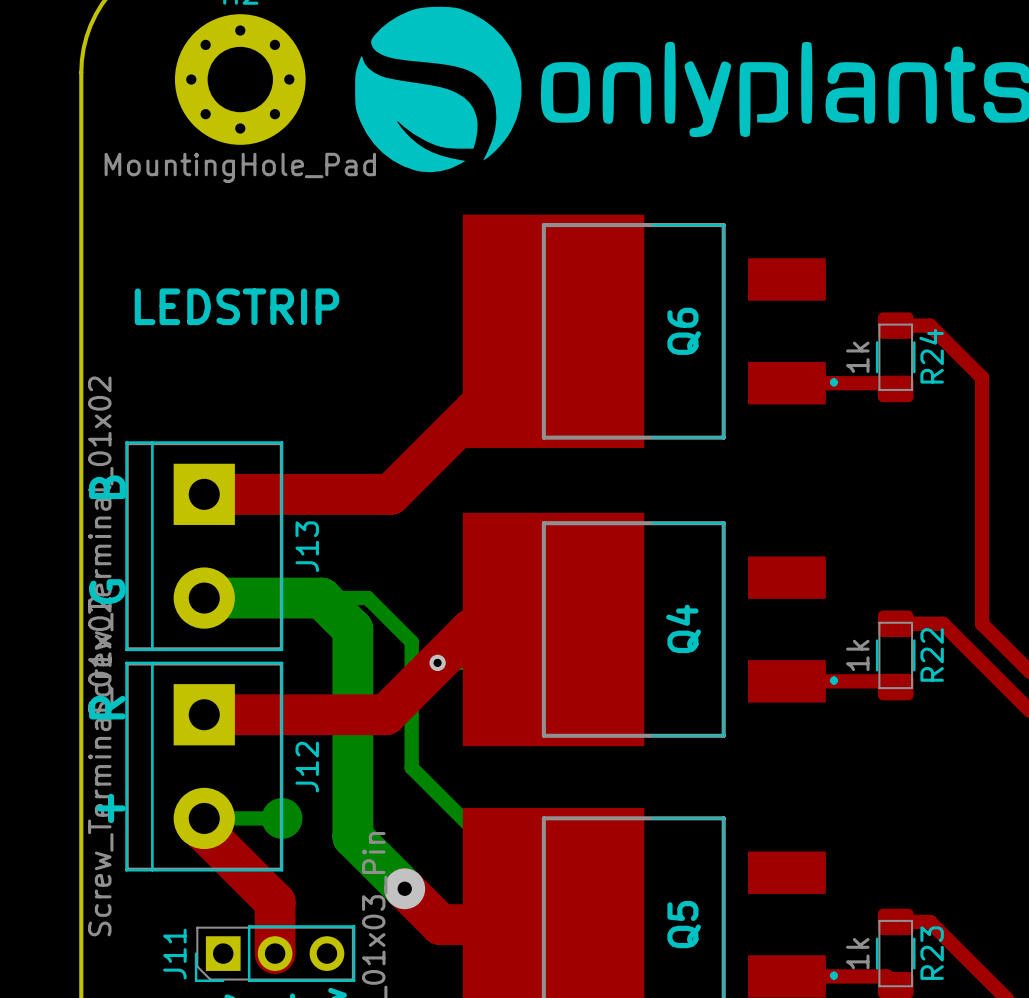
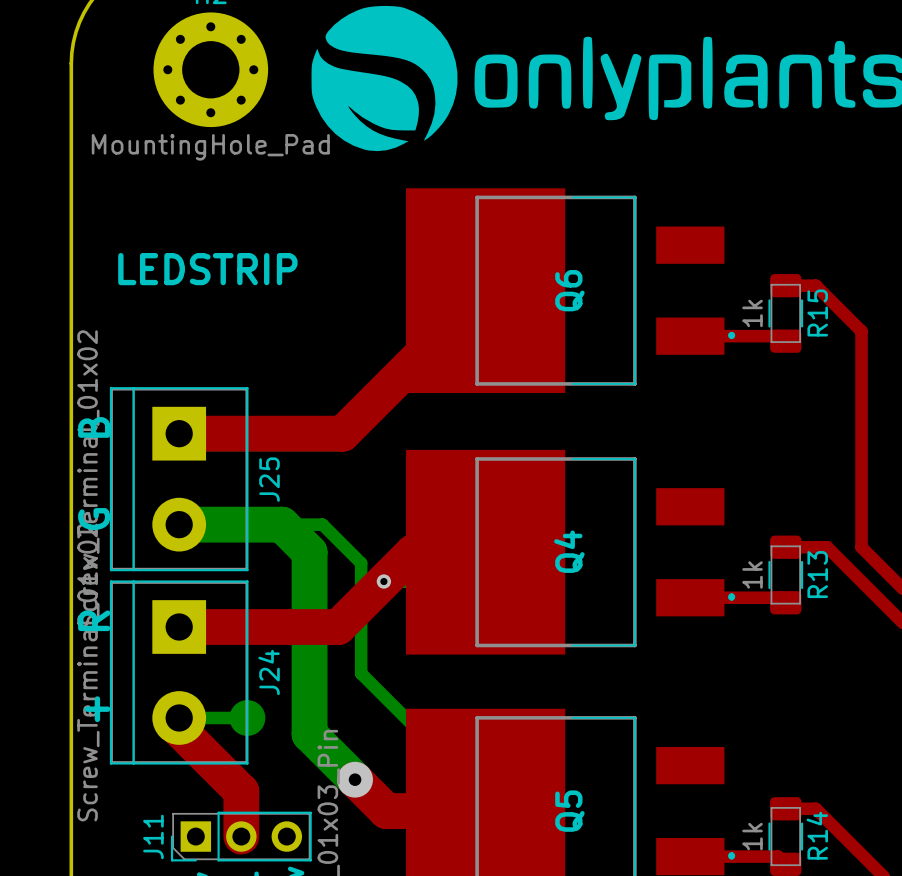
Q6 name position: Q6 (684, 331) -> Q6 (569, 290)
R24 name: R24 (931, 356) -> R15 (817, 312)
J13 name: J13 (307, 546) -> J25 (269, 479)
Q4 name position: Q4 (683, 628) -> Q4 (569, 551)
R22 name: R22 (932, 654) -> R13 (817, 574)
J12 name: J12 (307, 767) -> J24 (269, 672)
Q5 name position: Q5 (684, 924) -> Q5 (569, 811)
R23 name: R23 (932, 953) -> R14 (817, 835)

